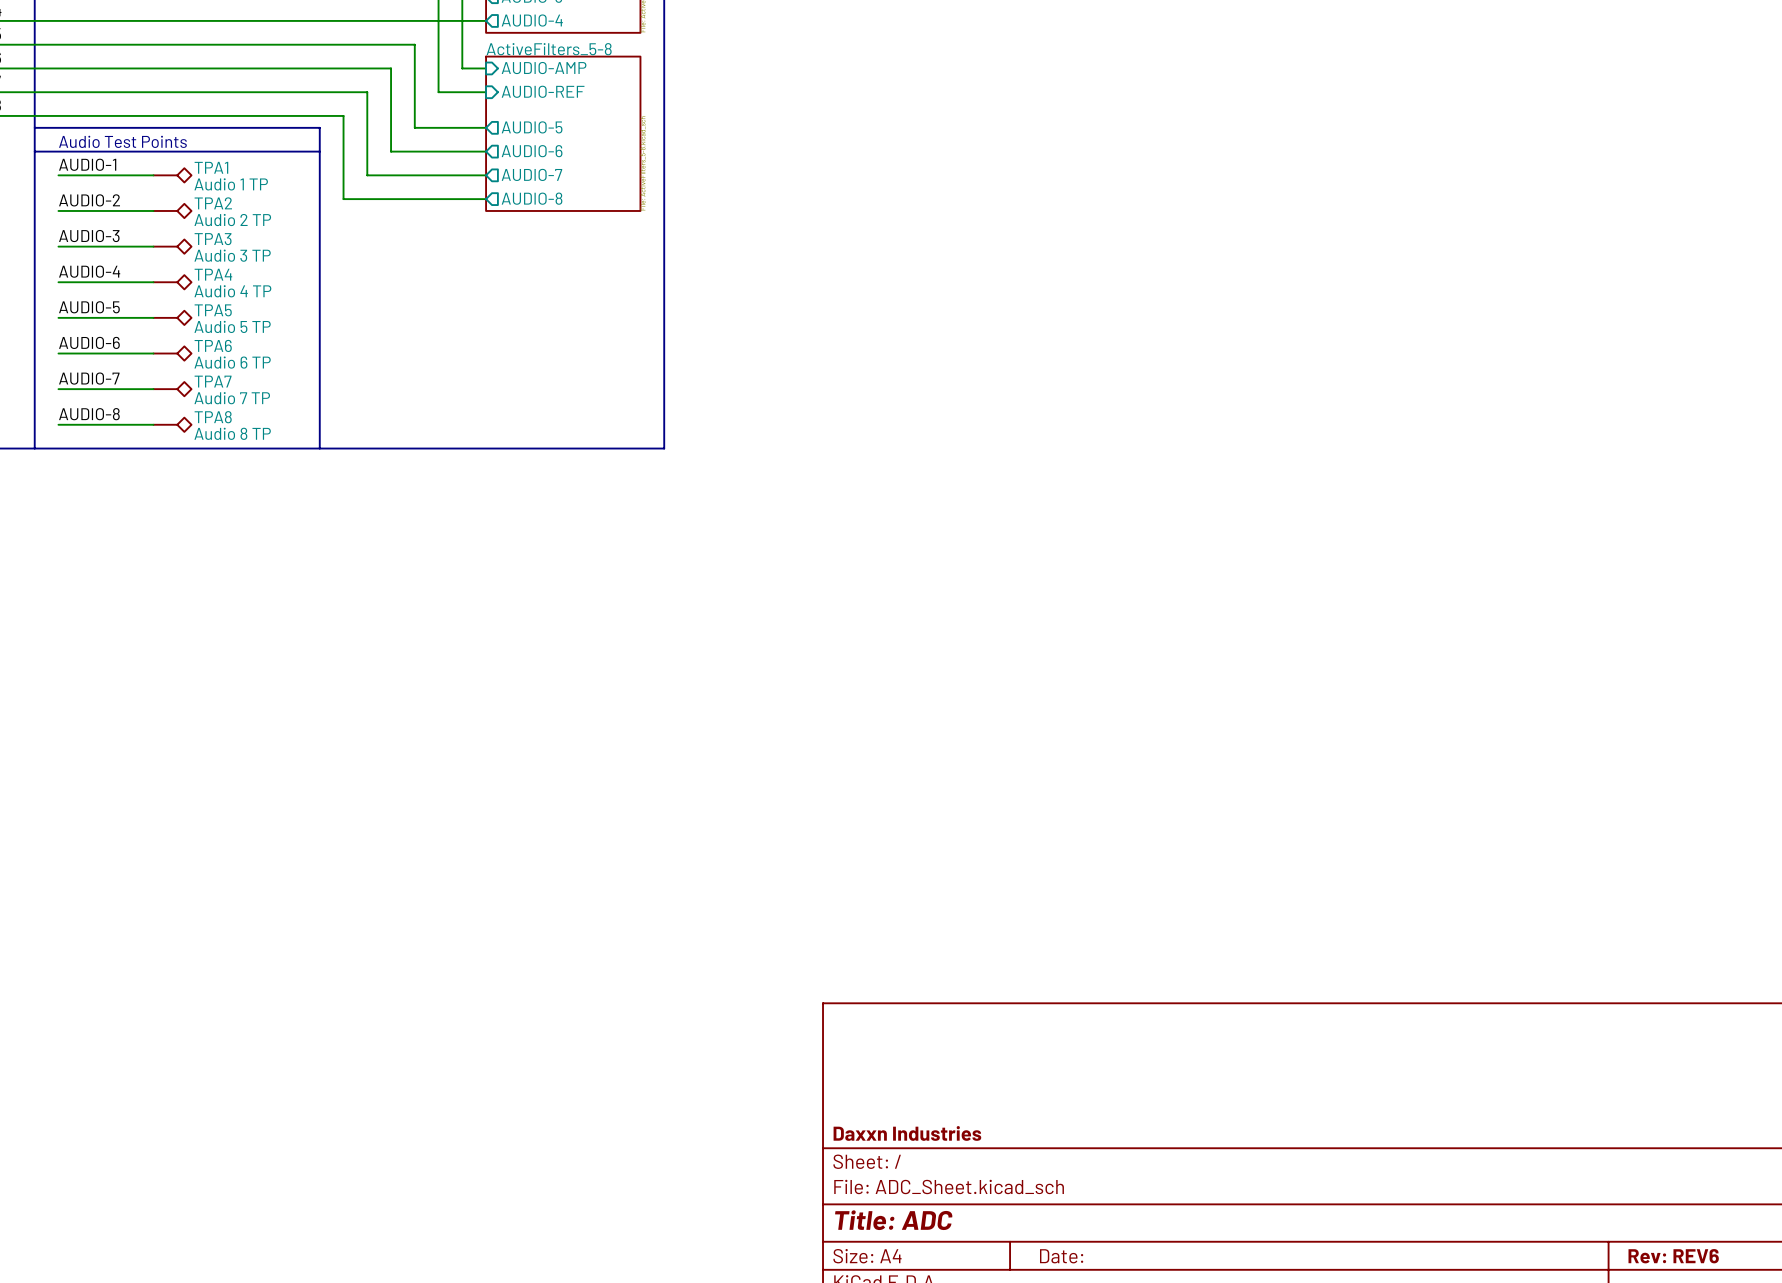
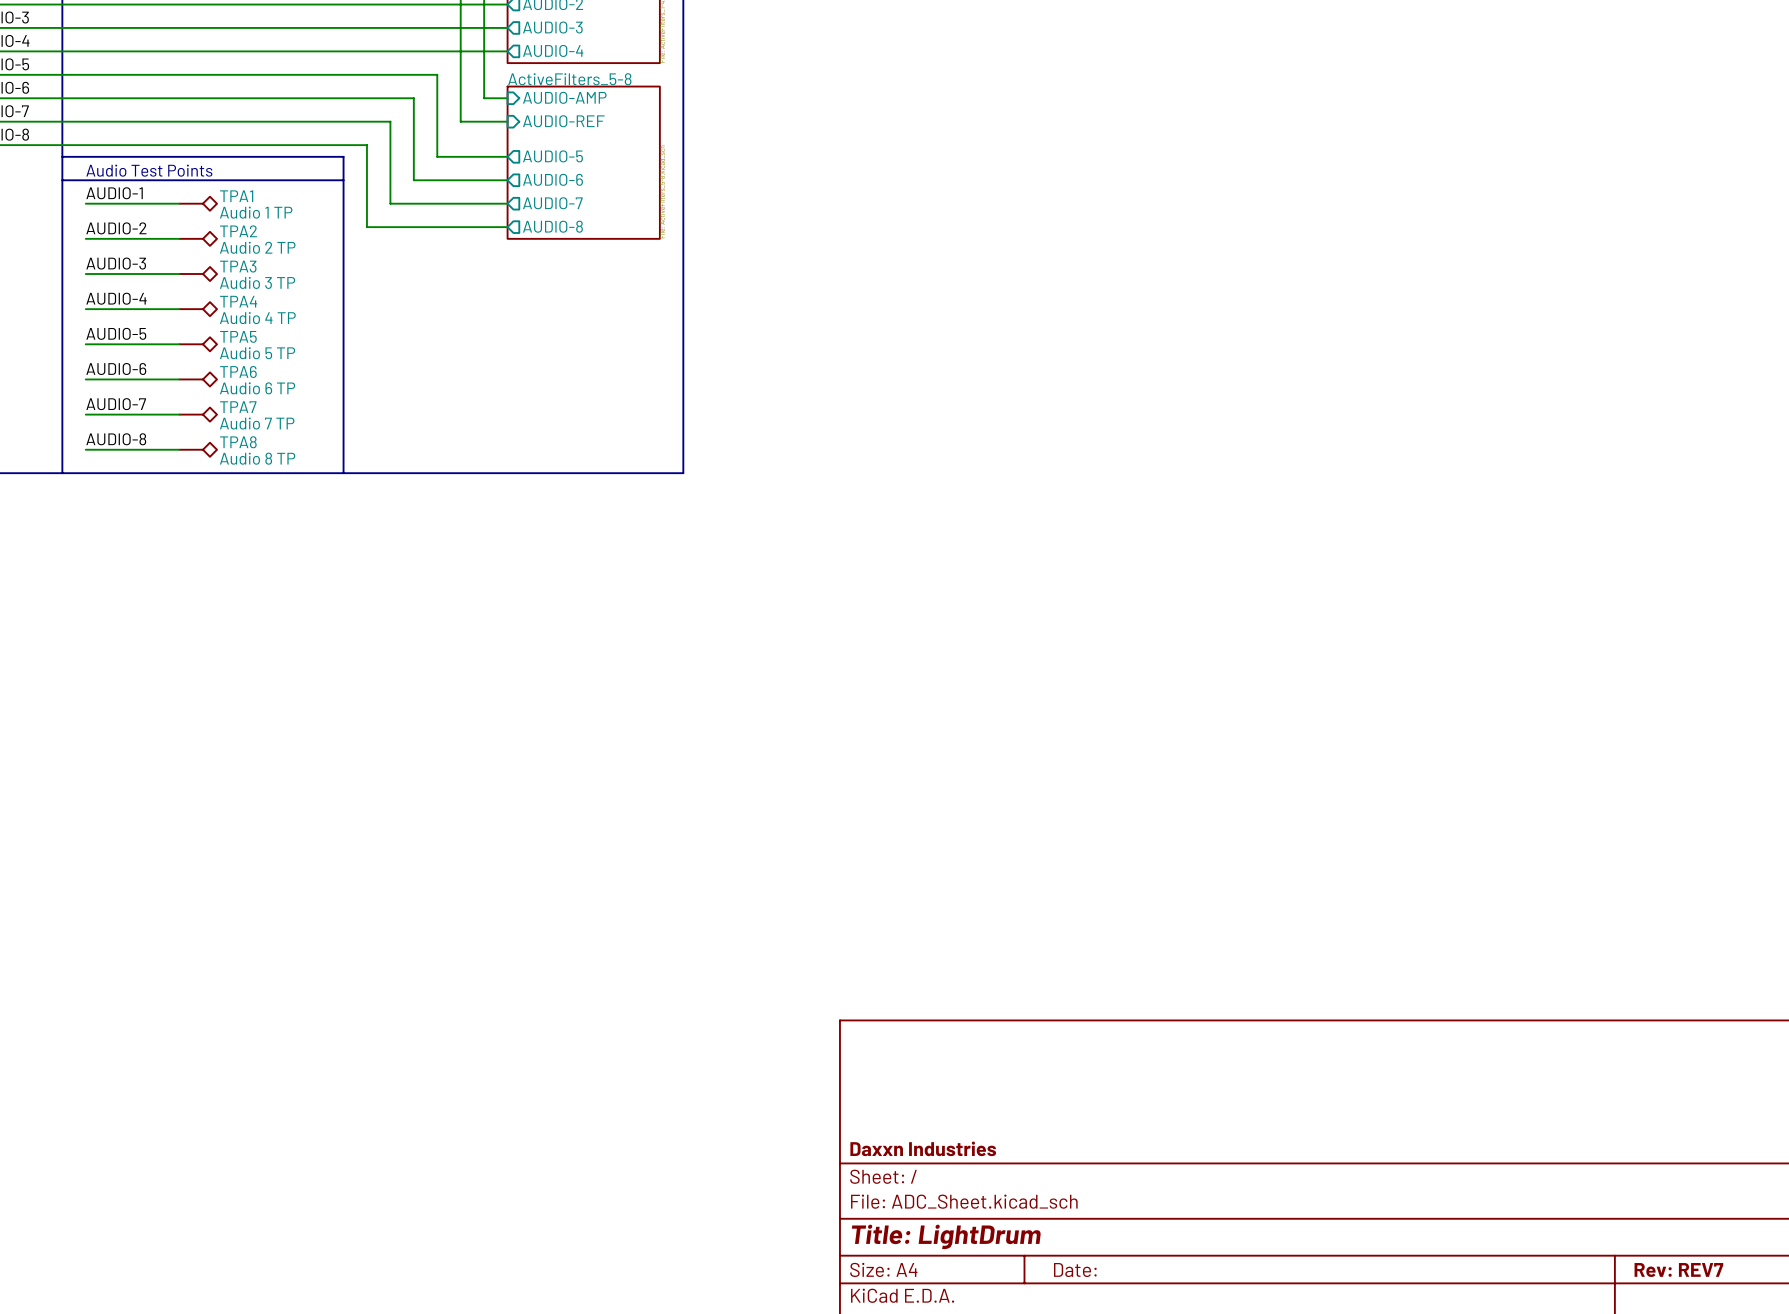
title block: Title: ADC (893, 1220) -> Title: LightDrum (946, 1236)
title block: Rev: REV6 (1673, 1256) -> Rev: REV7 (1678, 1270)

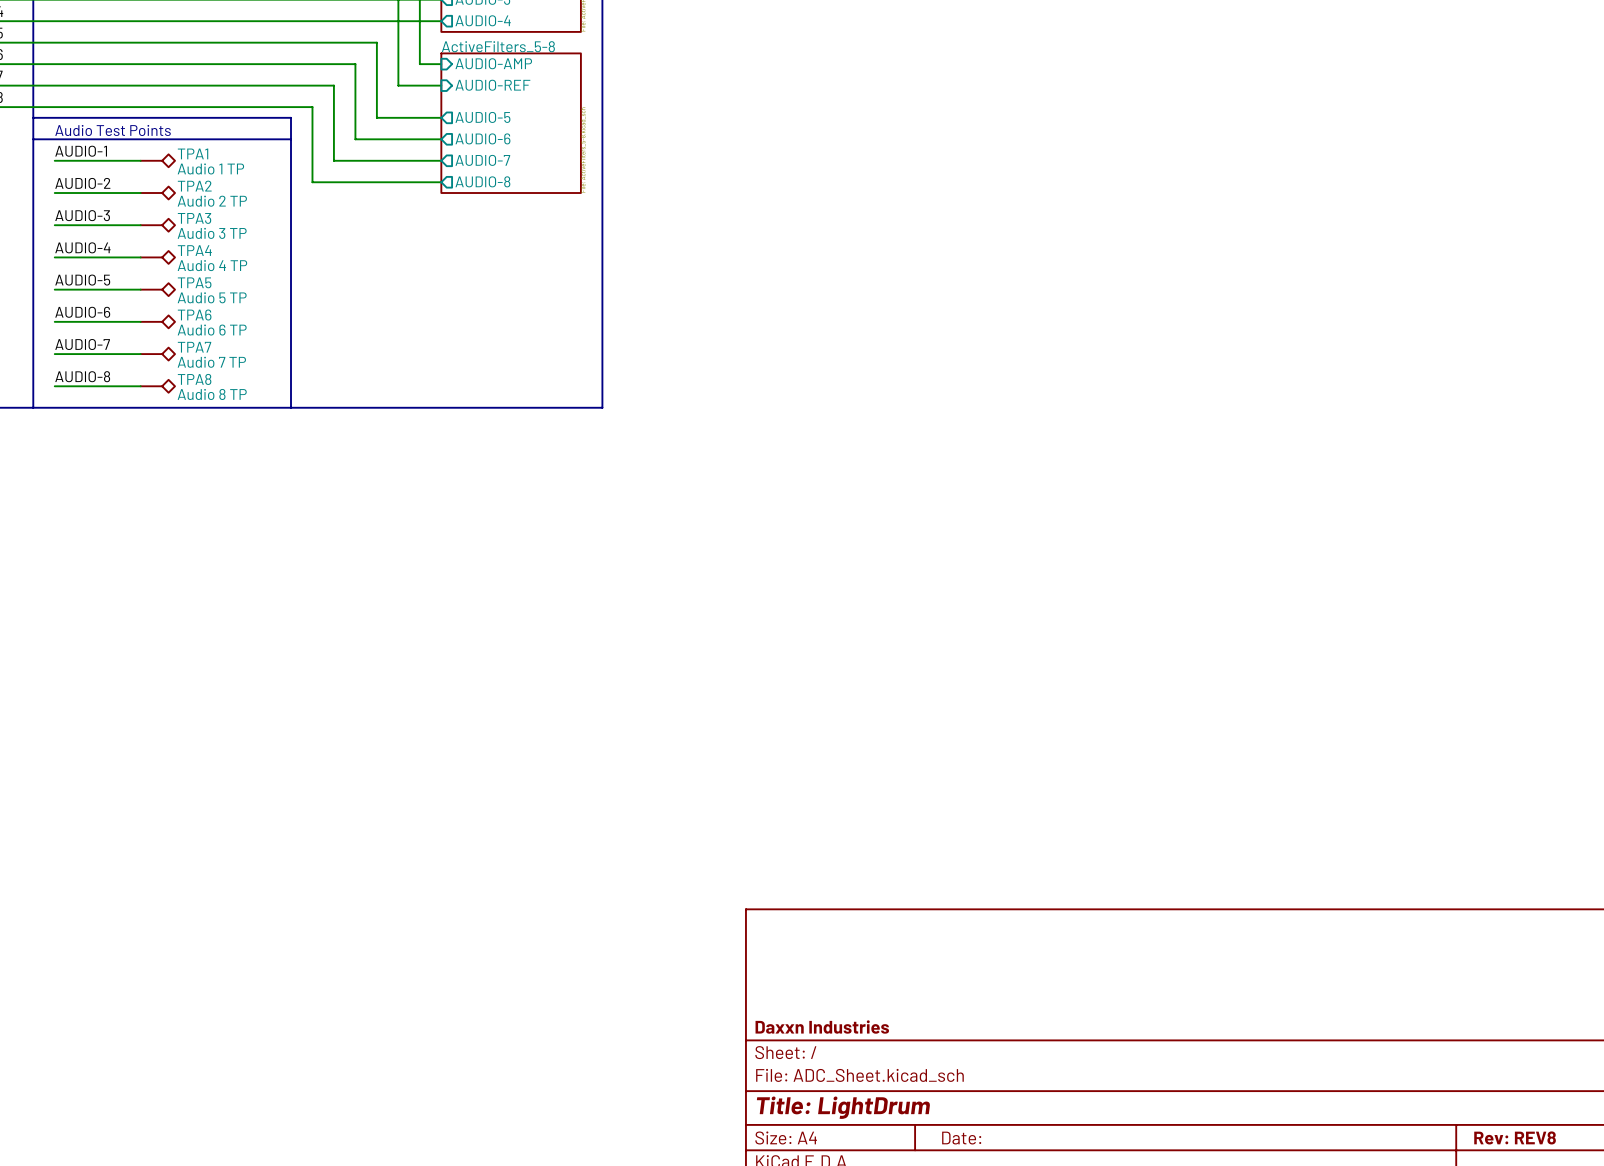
title block: Rev: REV7 (1678, 1270) -> Rev: REV8 (1515, 1137)

